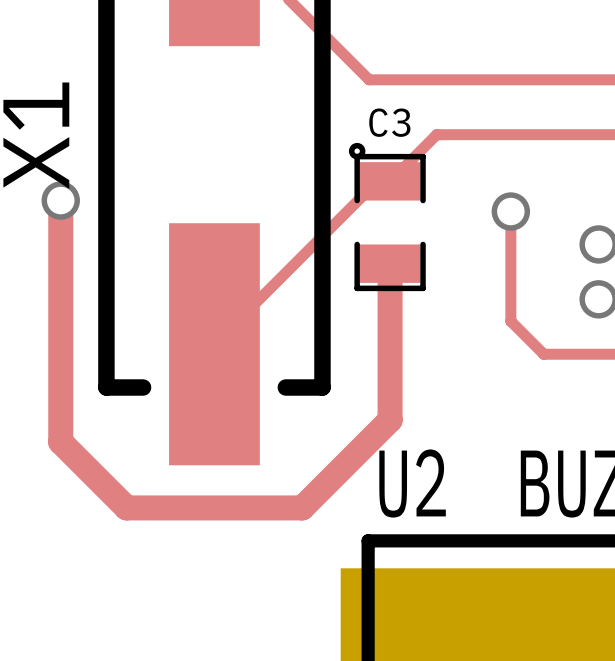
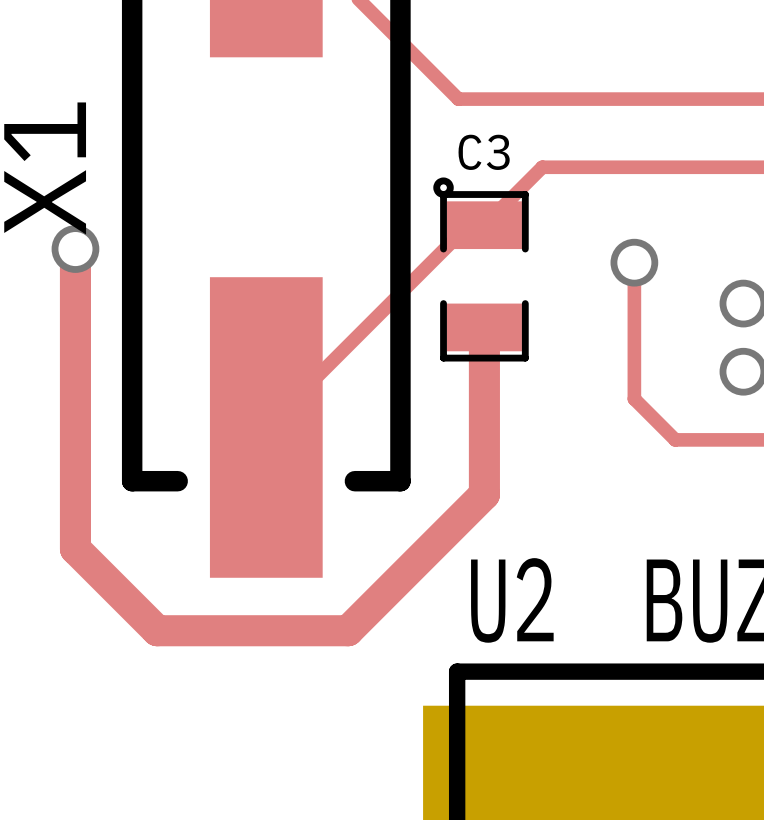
track: (390, 398) (390, 420) (302, 507) (280, 507) -> (484, 494) (348, 630)

